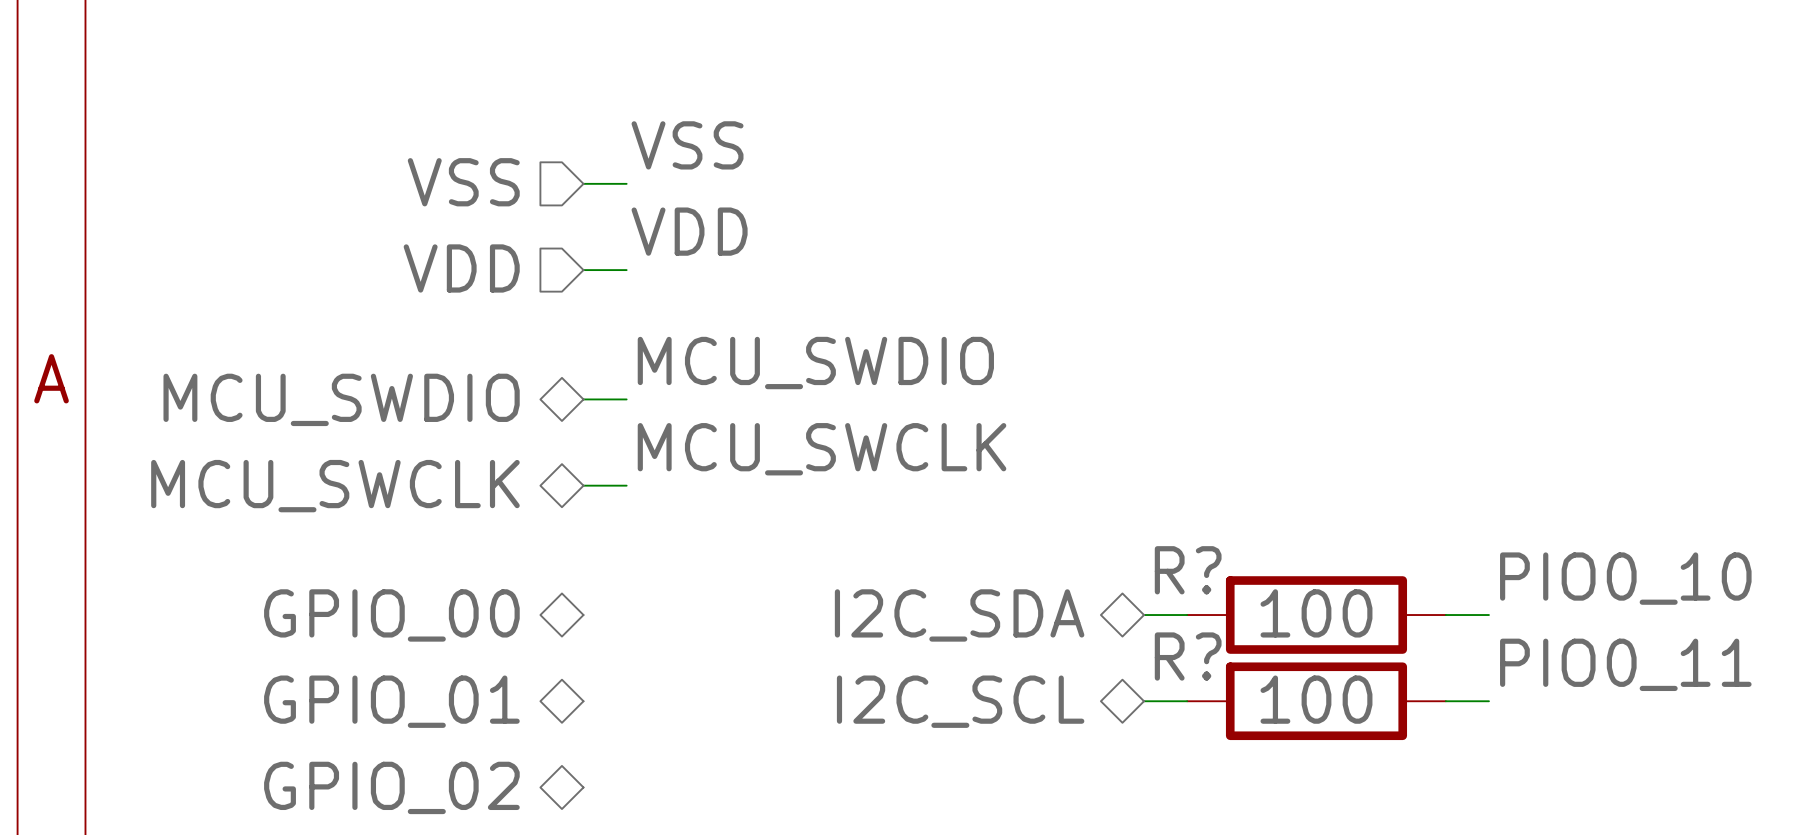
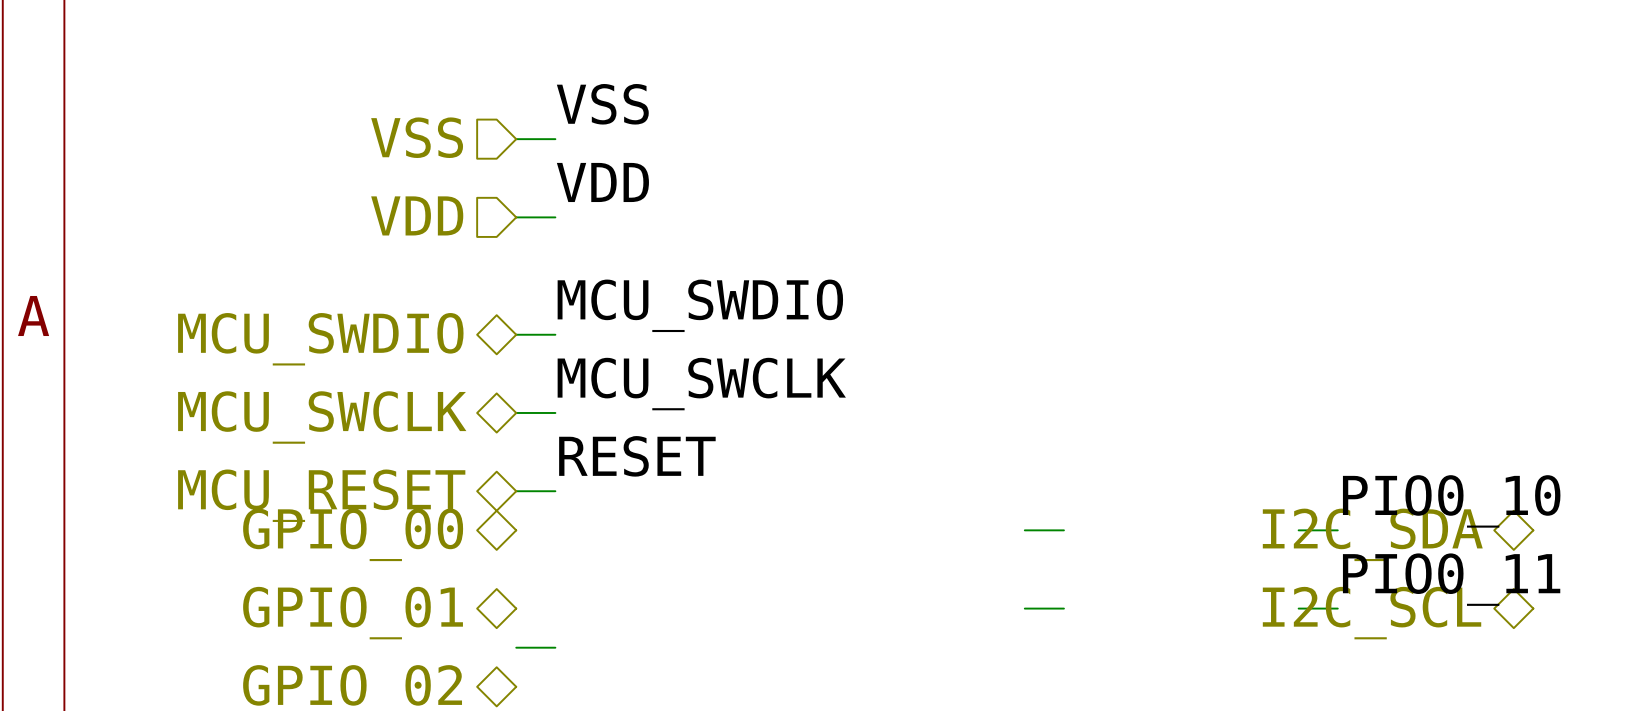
label: none -> RESET (637, 456)
wire: none -> (516, 491) (555, 491)
hierarchical label: none -> MCU_RESET (321, 495)
hierarchical label position: I2C_SDA (959, 615) -> I2C_SDA (1372, 534)
R?: 100 (1316, 615) -> none
hierarchical label position: I2C_SCL (960, 701) -> I2C_SCL (1372, 613)
R?: 100 (1316, 701) -> none
wire: none -> (516, 647) (555, 647)

